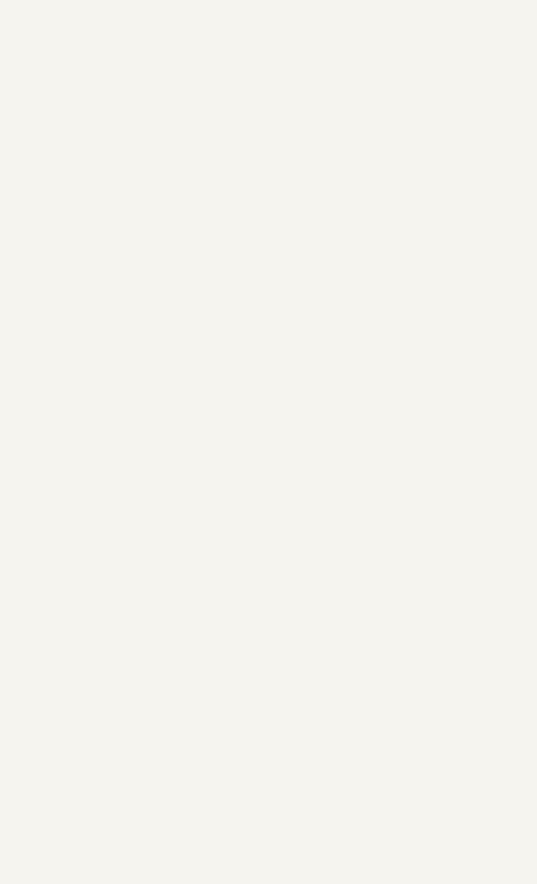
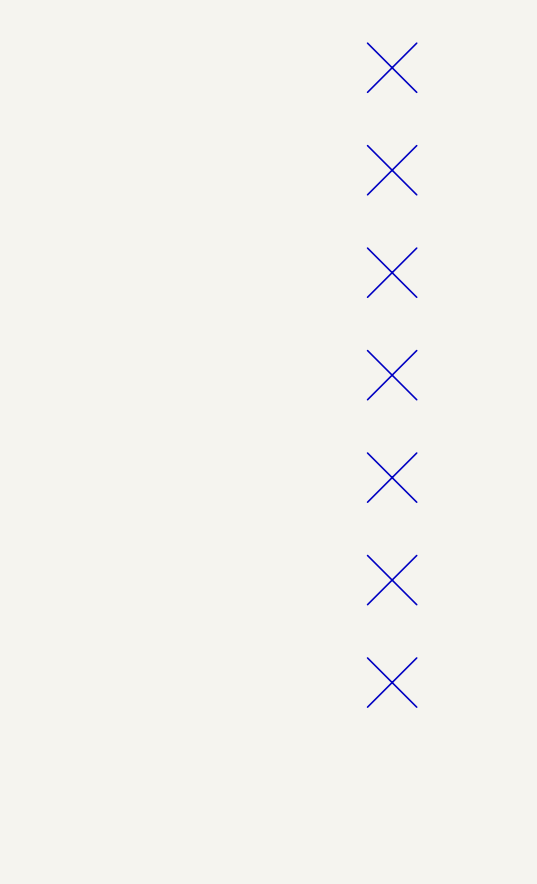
no-connect mark: none -> (392, 67)
no-connect mark: none -> (392, 170)
no-connect mark: none -> (392, 272)
no-connect mark: none -> (392, 375)
no-connect mark: none -> (392, 477)
no-connect mark: none -> (392, 580)
no-connect mark: none -> (392, 682)

